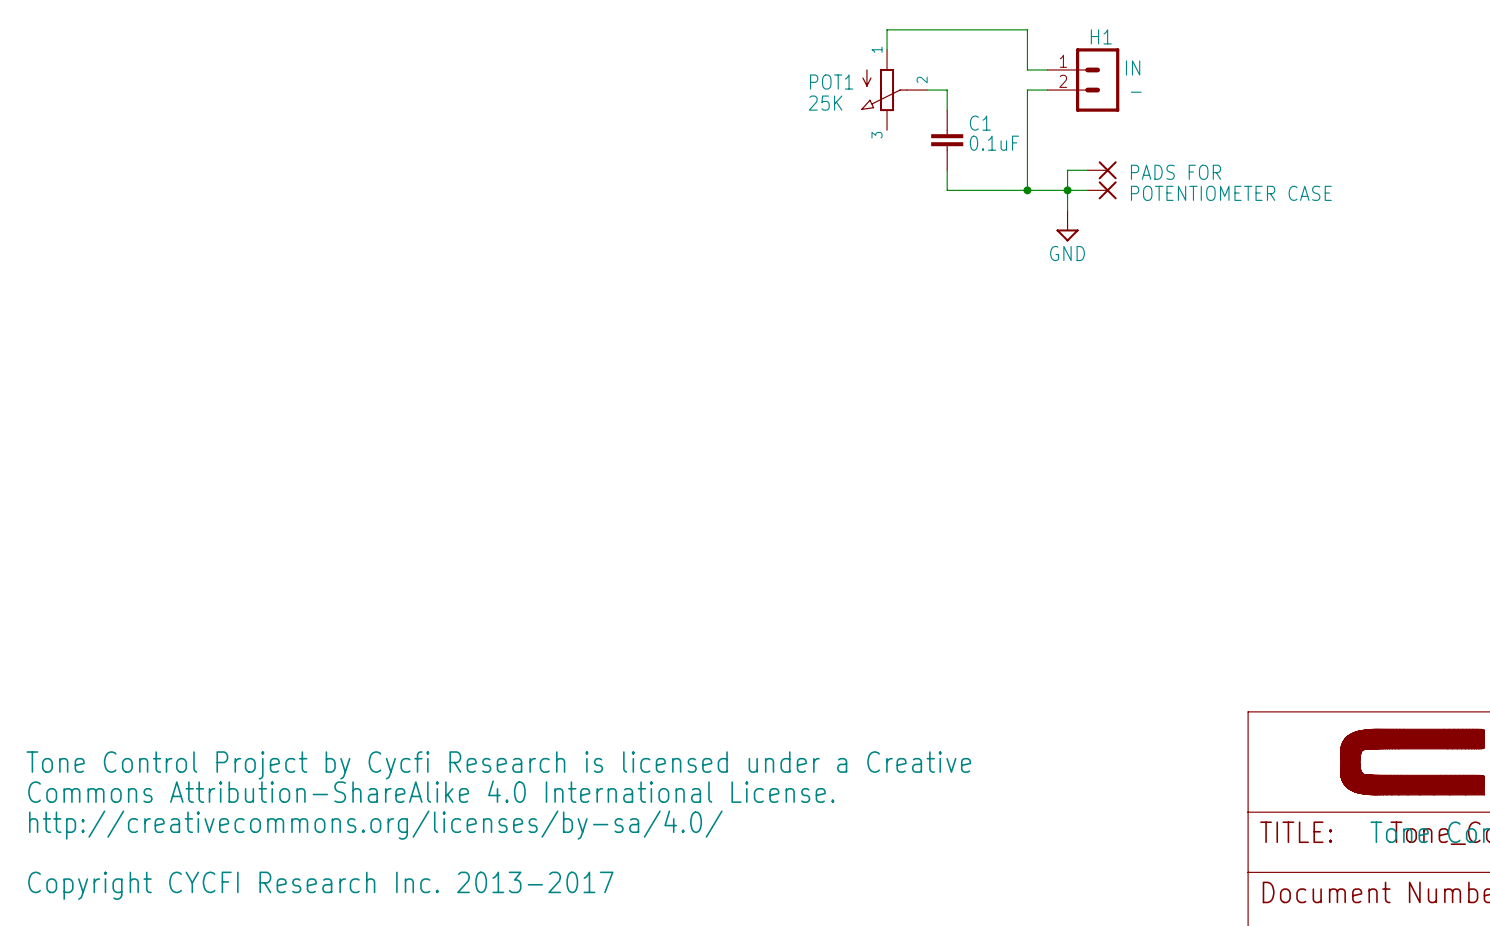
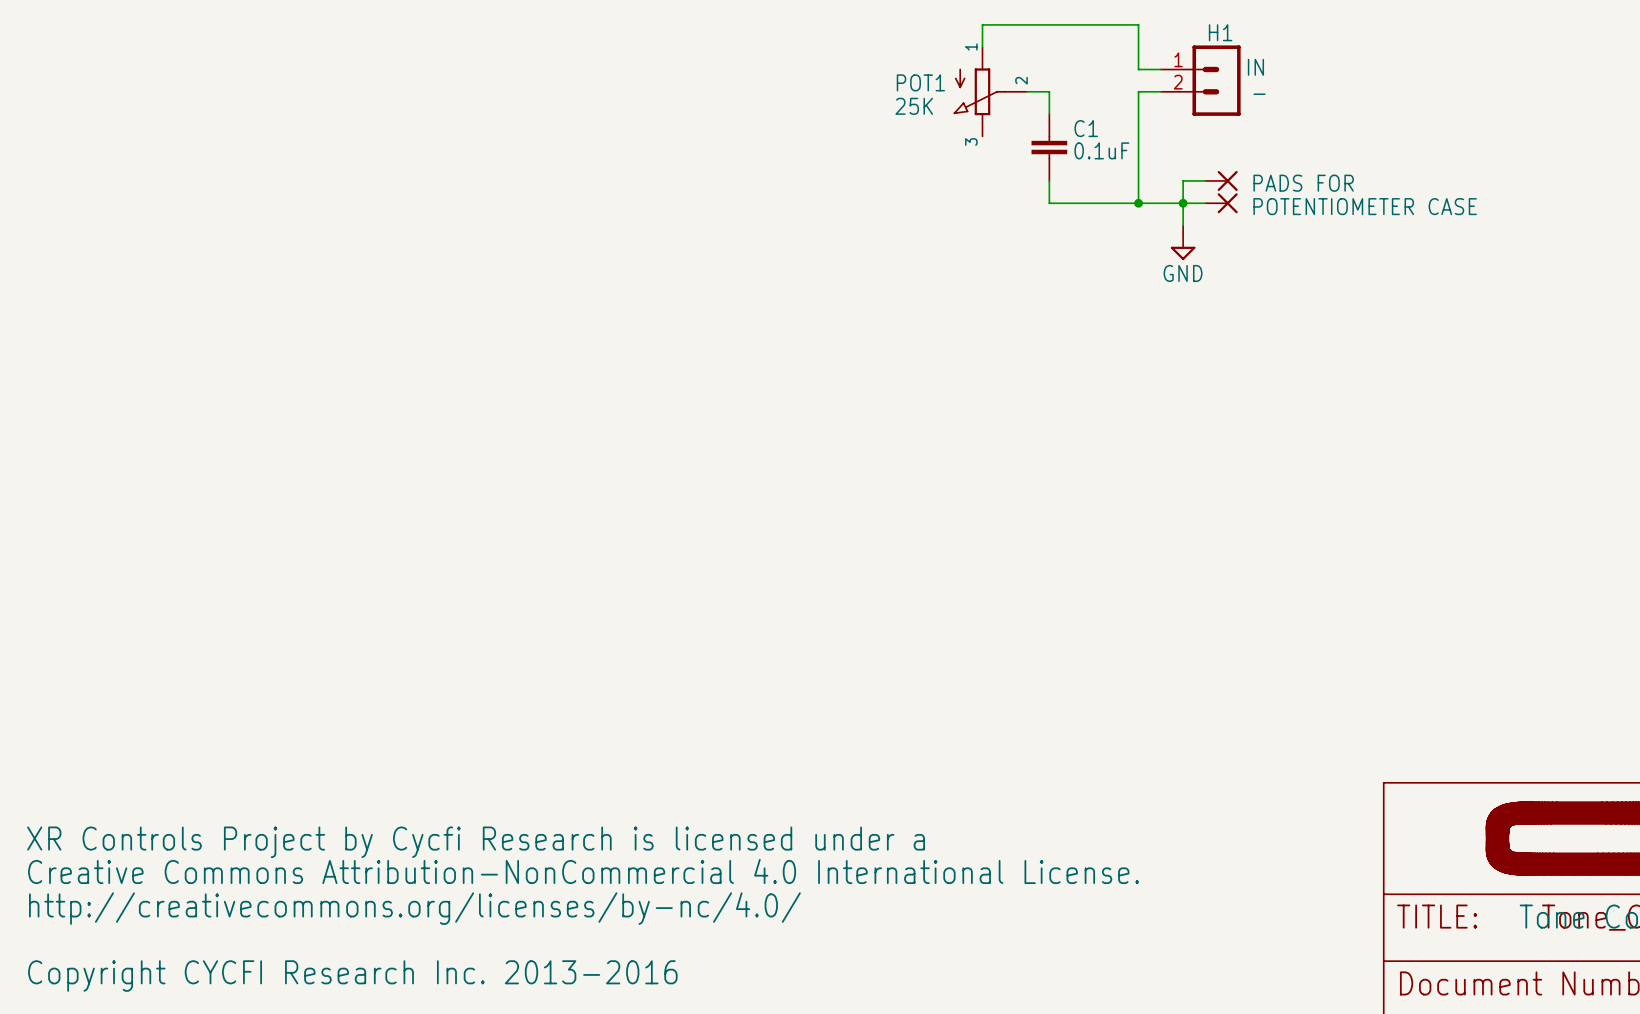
text: Tone Control Project by Cycfi Research is licensed under a Creative (498, 765) -> XR Controls Project by Cycfi Research is licensed under a (476, 842)
text: Commons Attribution-ShareAlike 4.0 International License. (431, 791) -> Creative Commons Attribution-NonCommercial 4.0 International License. (583, 871)
text: http://creativecommons.org/licenses/by-sa/4.0/ (375, 825) -> http://creativecommons.org/licenses/by-nc/4.0/ (414, 908)
text: Copyright CYCFI Research Inc. 2013-2017 (320, 885) -> Copyright CYCFI Research Inc. 2013-2016 (352, 976)

